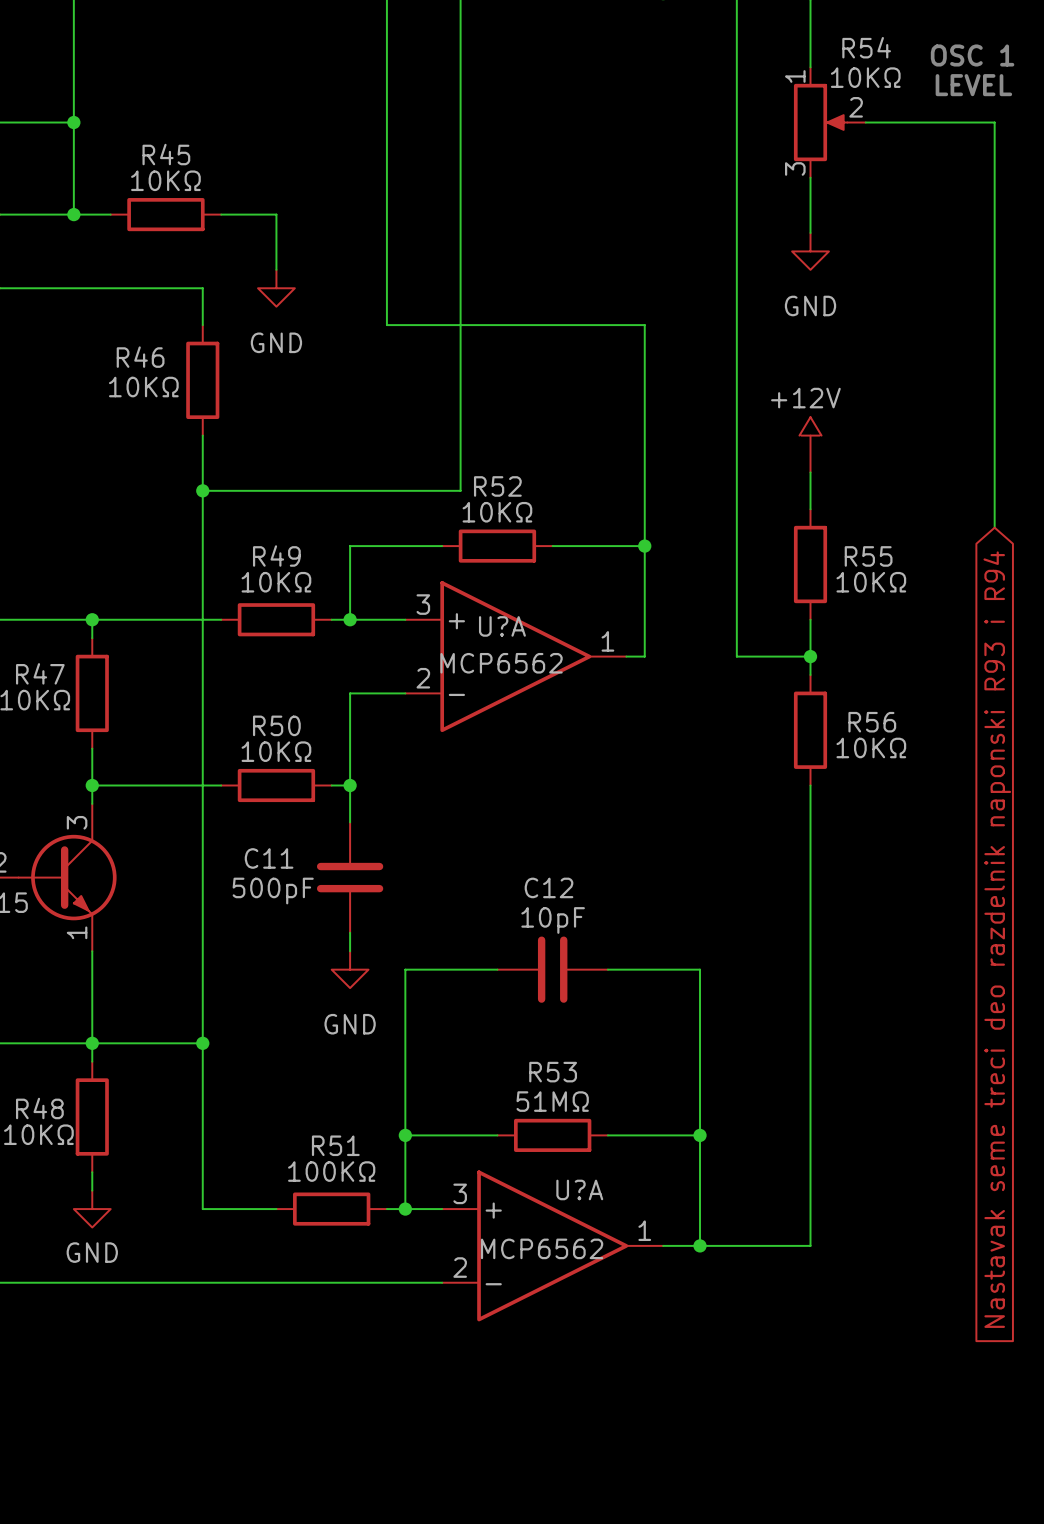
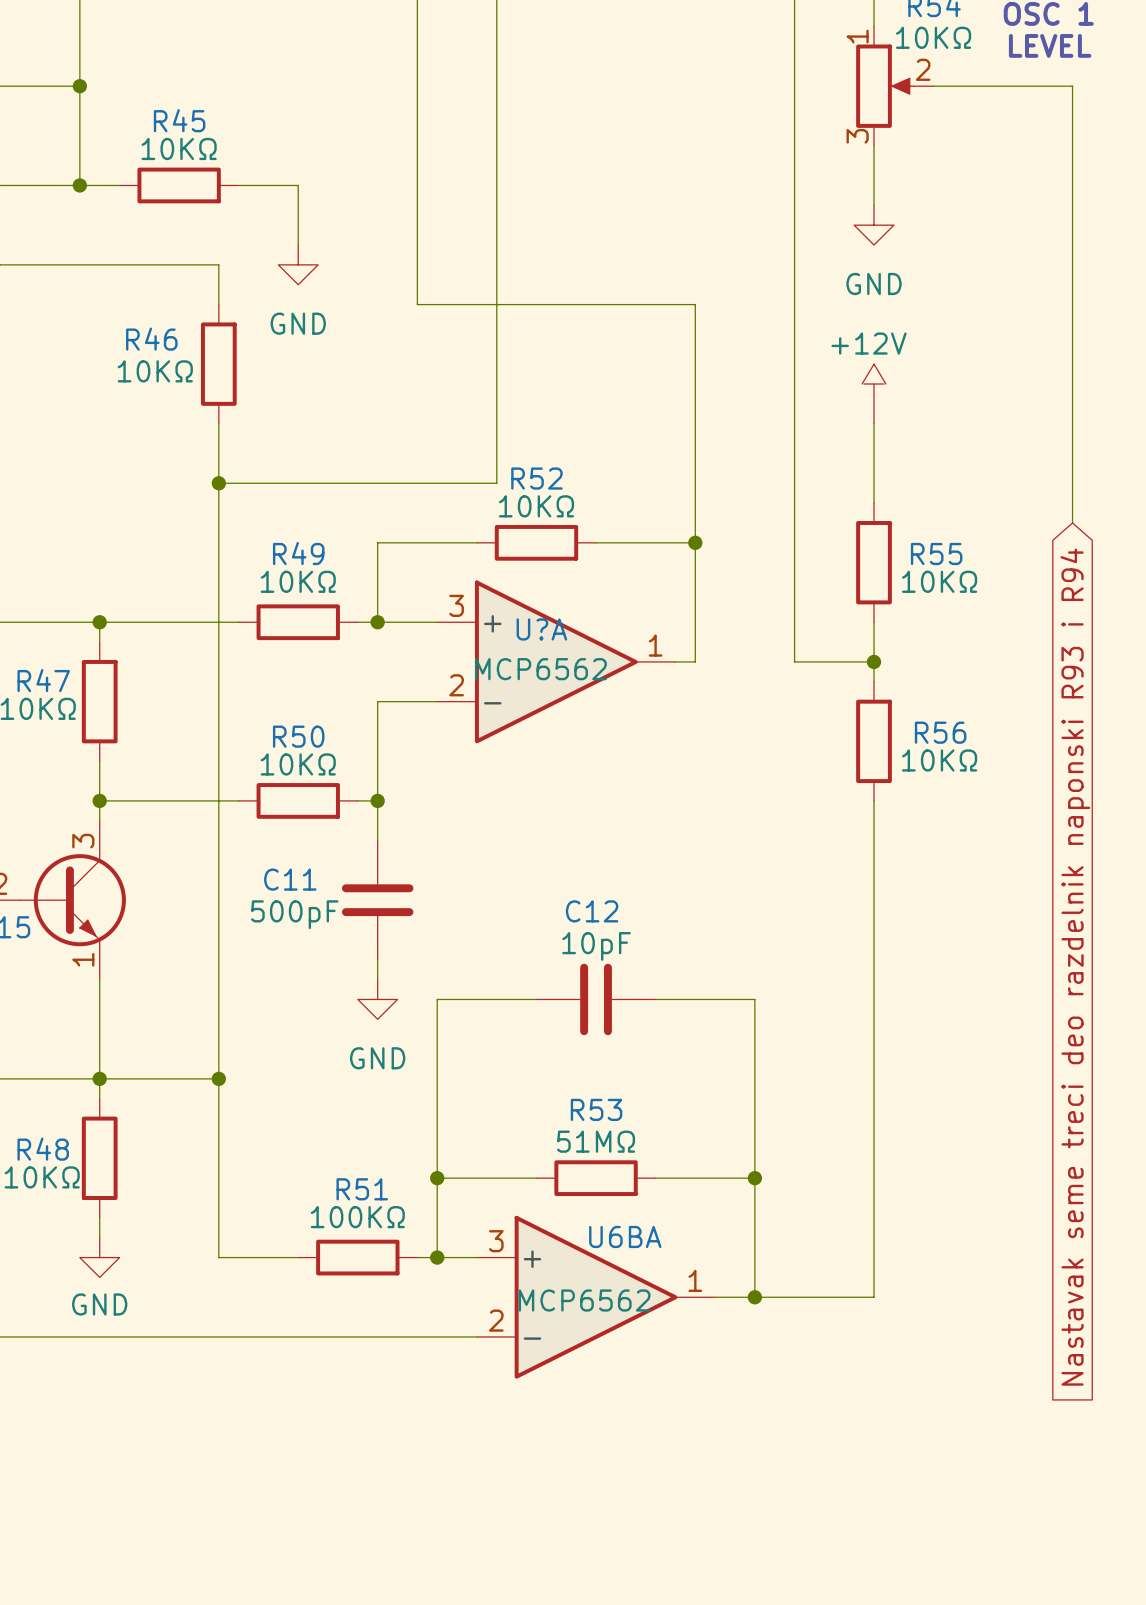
part position: (810, 444) -> (874, 393)
U?A name: U?A (579, 1189) -> U6BA (625, 1236)

